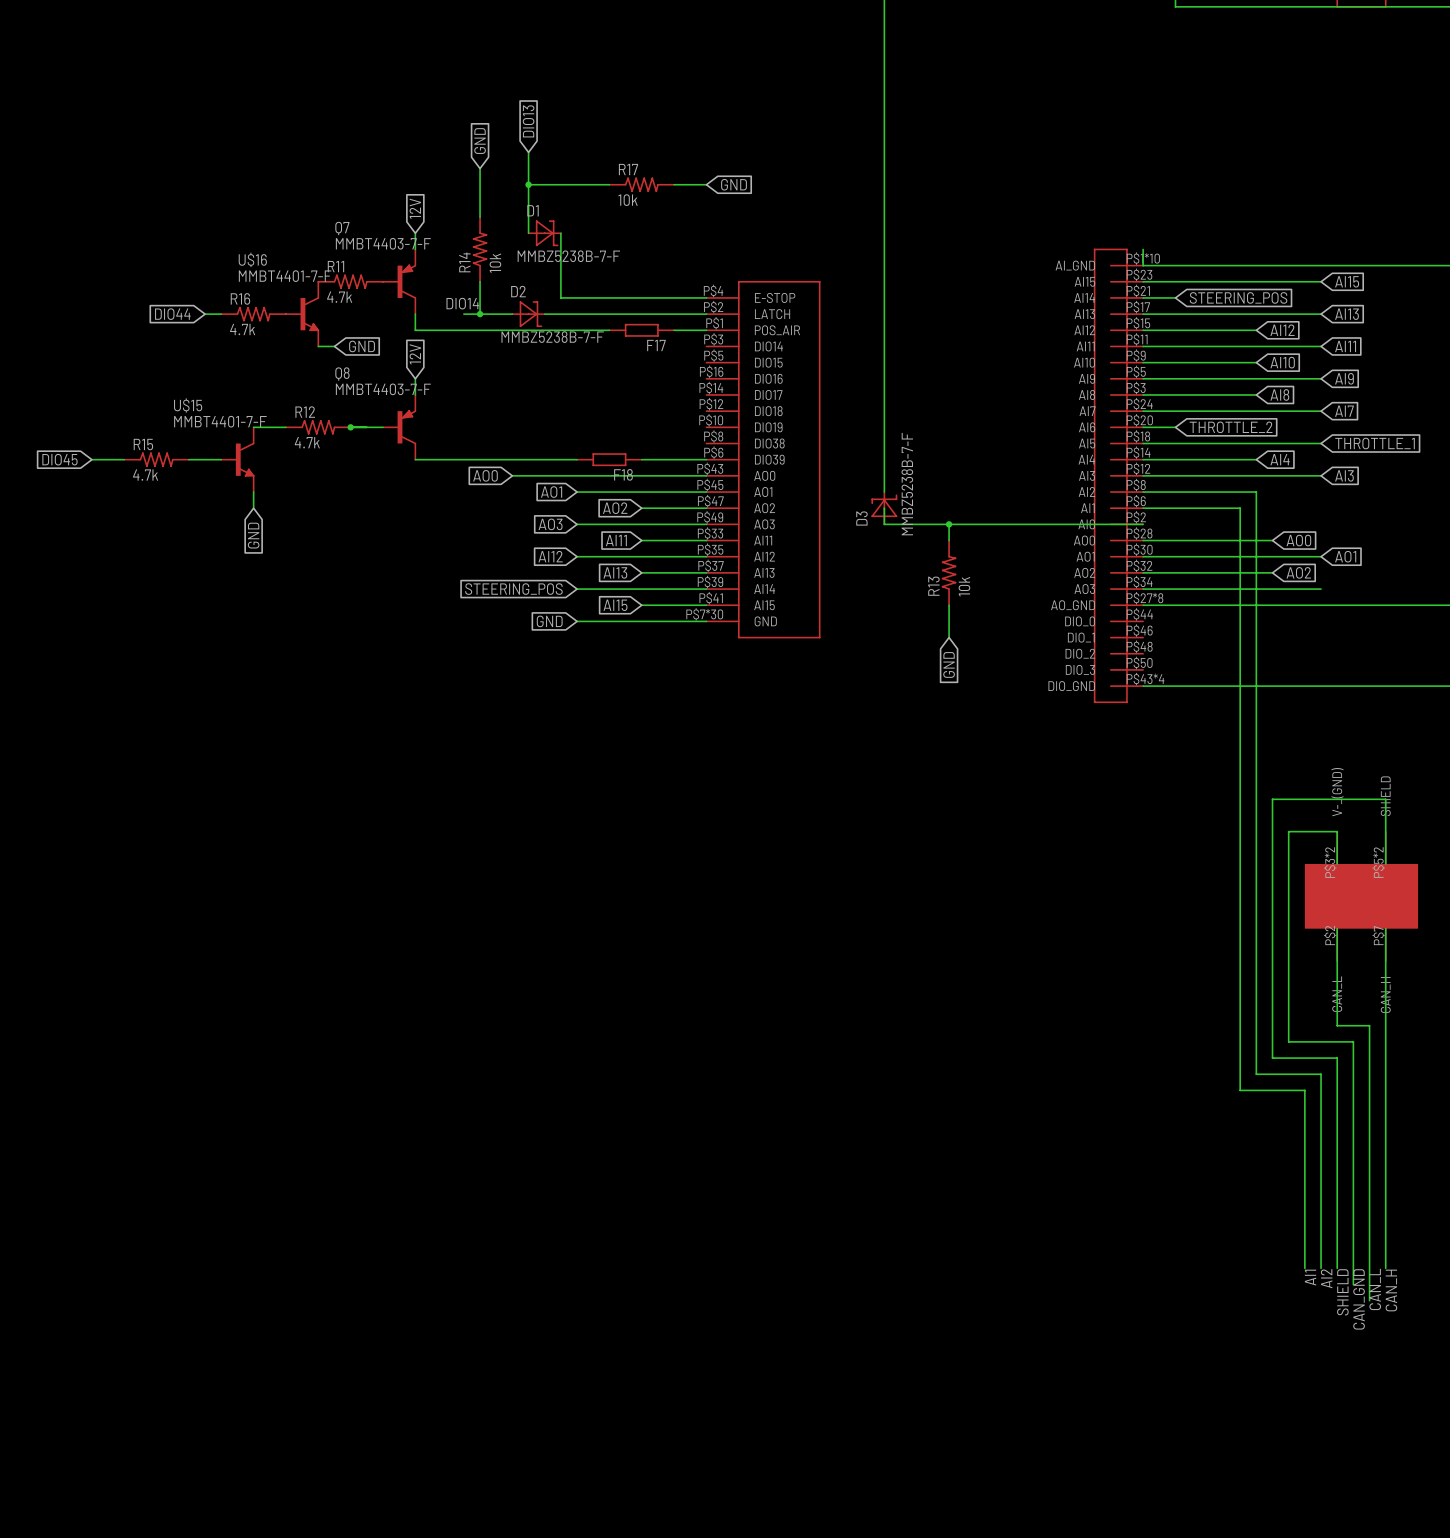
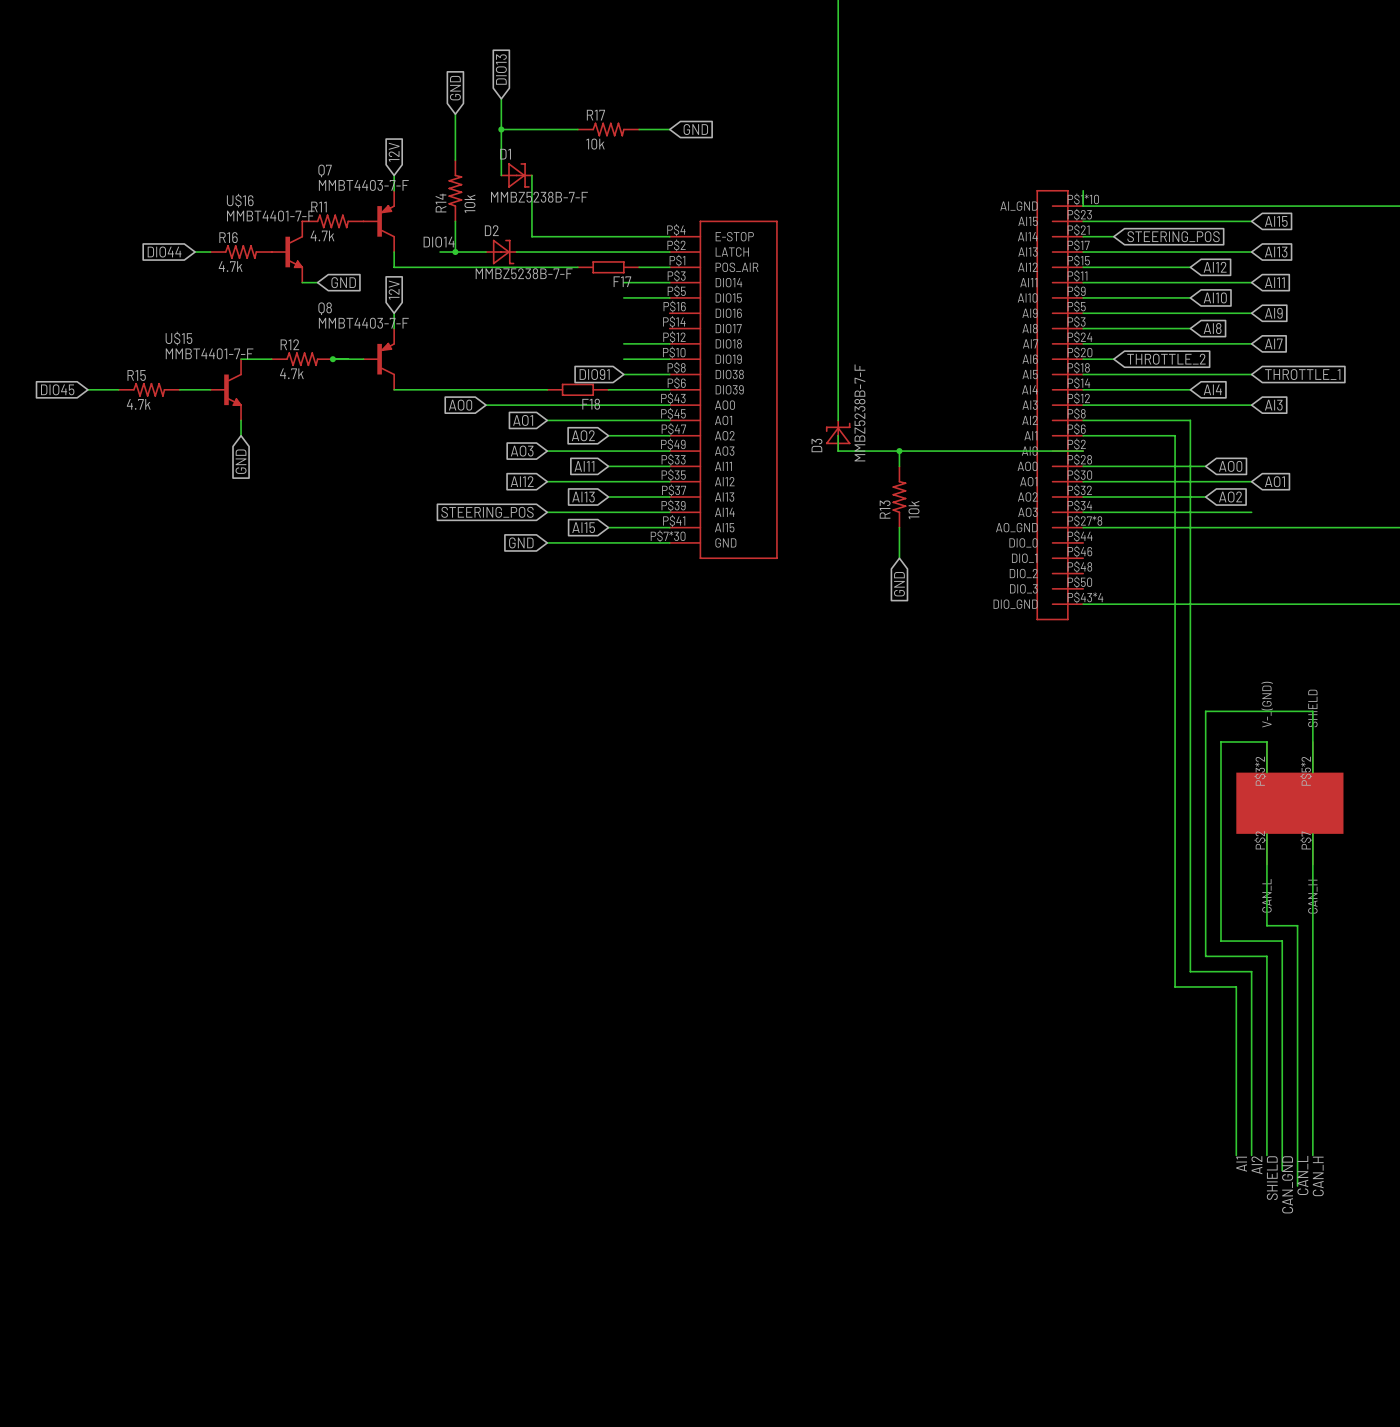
wire: none -> (623, 282) (669, 282)
wire: none -> (623, 297) (669, 297)
wire: none -> (623, 343) (669, 343)
wire: none -> (623, 359) (669, 359)
global label: none -> DIO91 (594, 374)
wire: none -> (623, 374) (669, 374)

